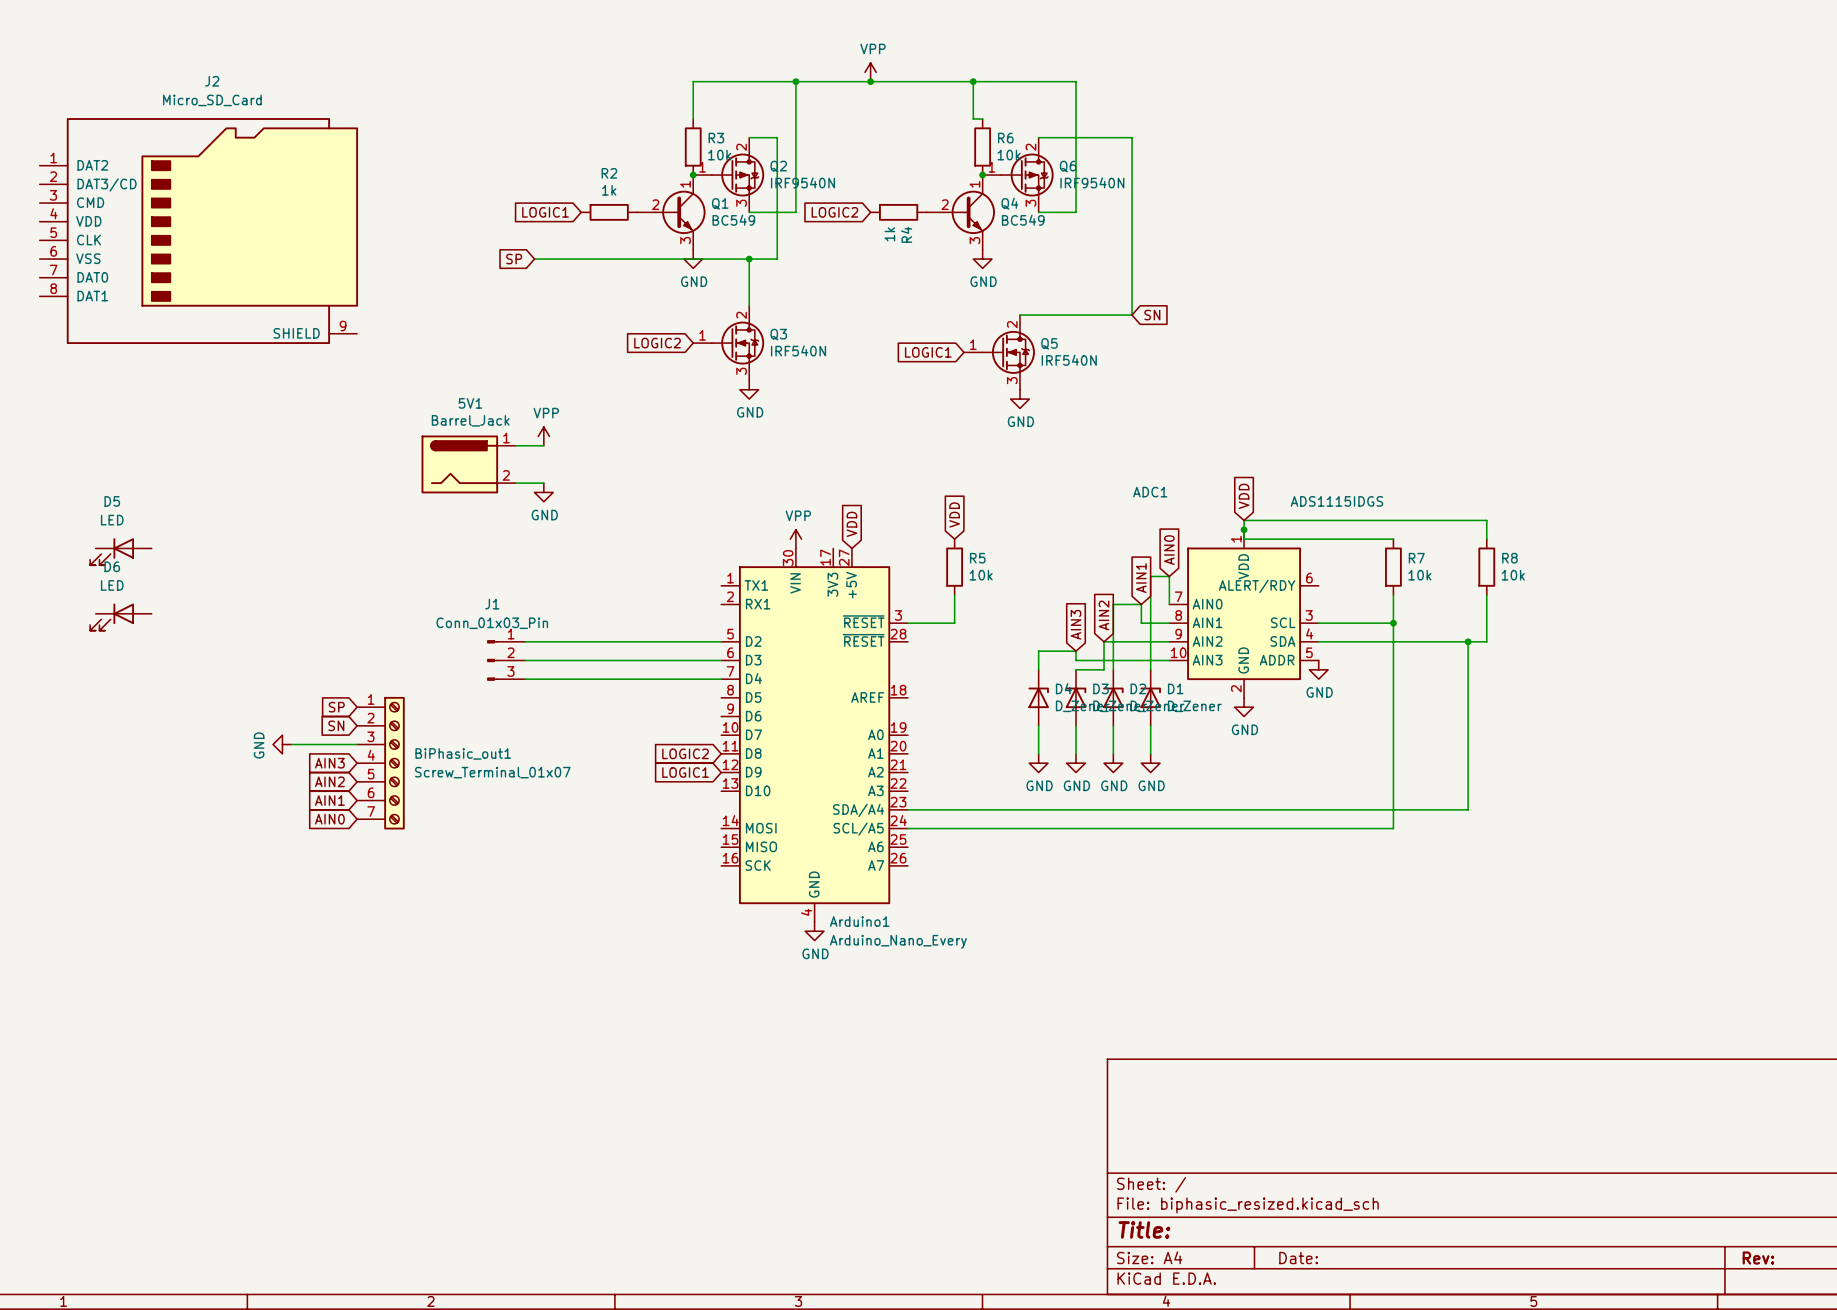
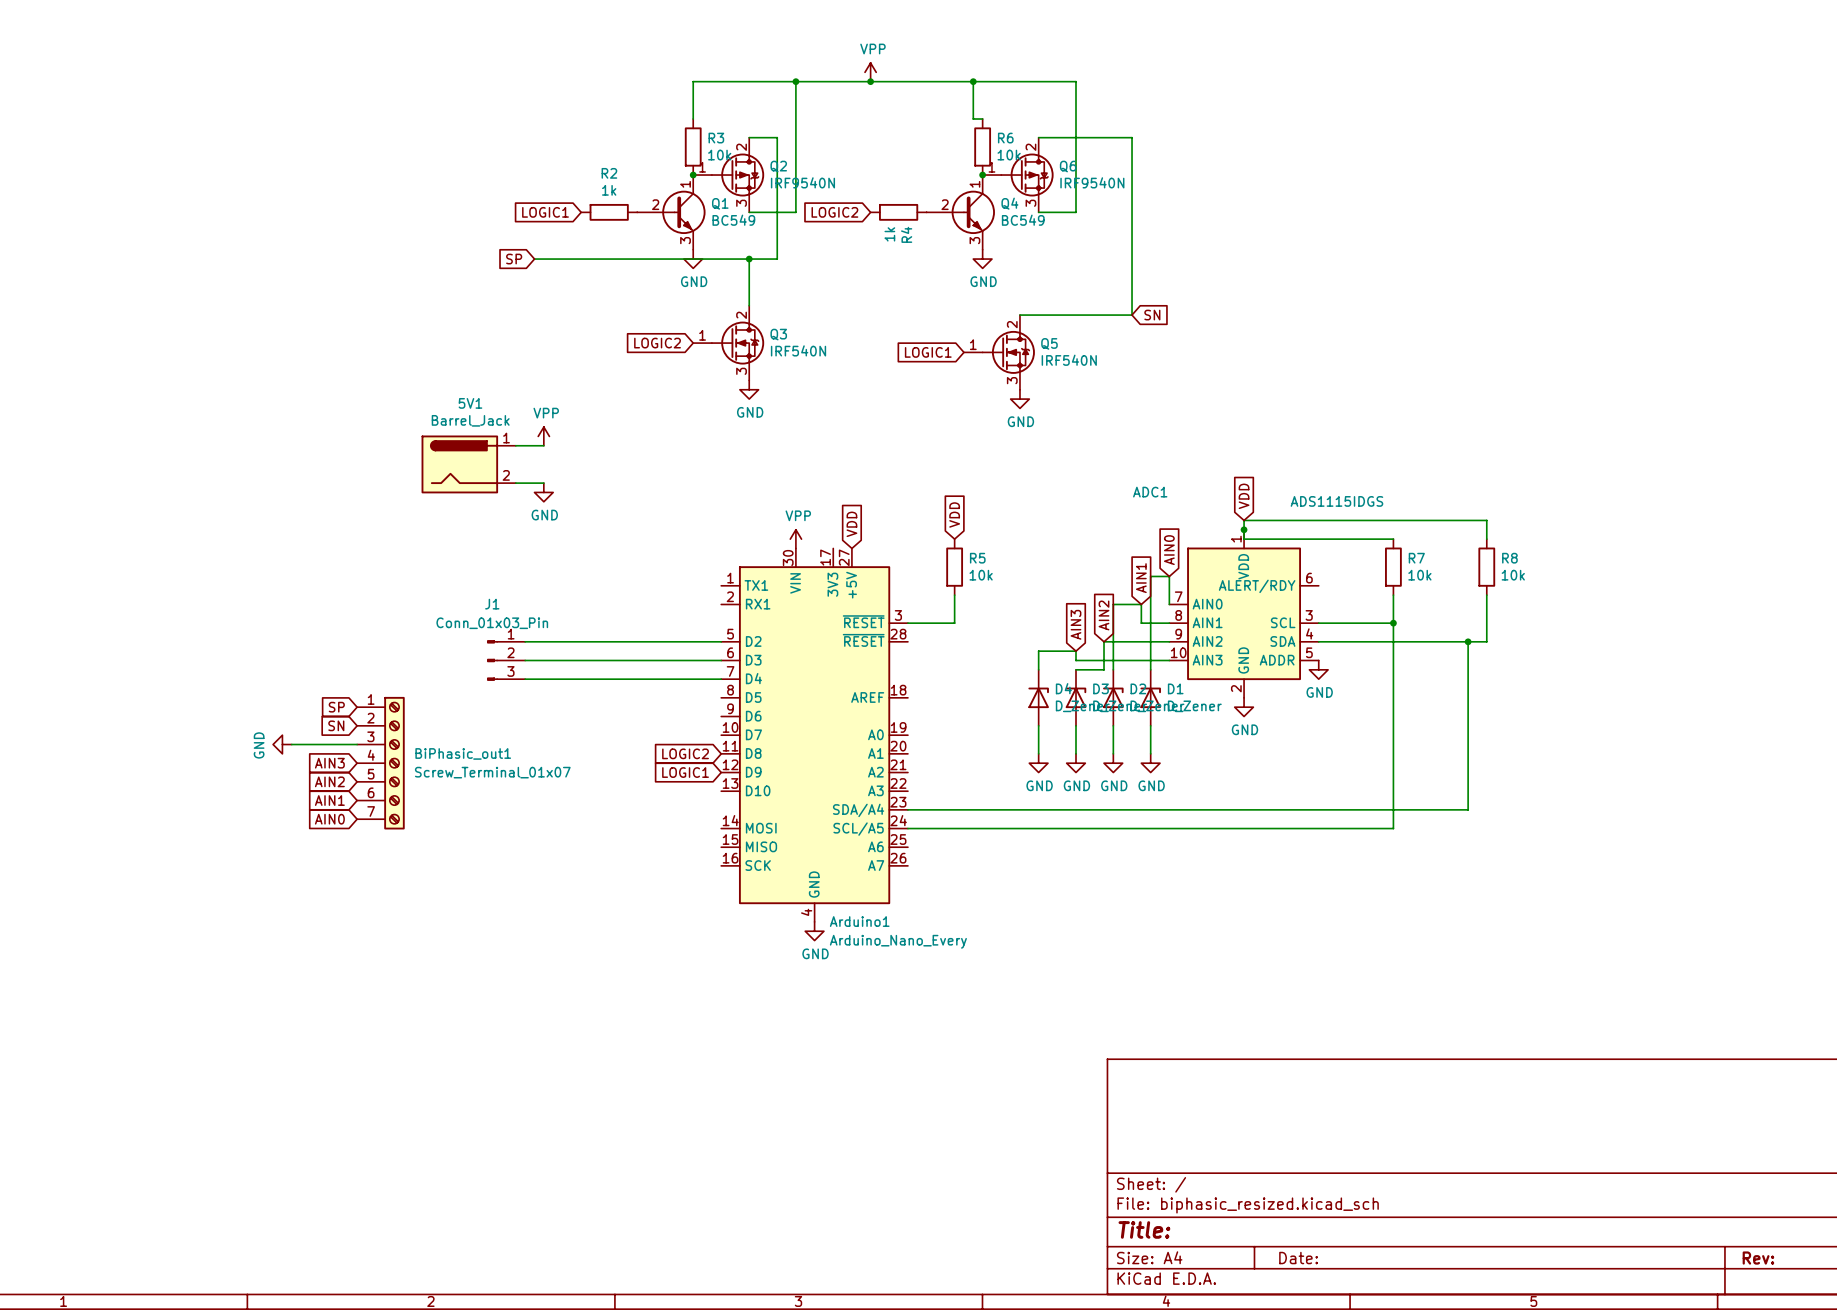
J2: Micro_SD_Card (198, 231) -> none
D5: LED (120, 551) -> none
D6: LED (120, 617) -> none

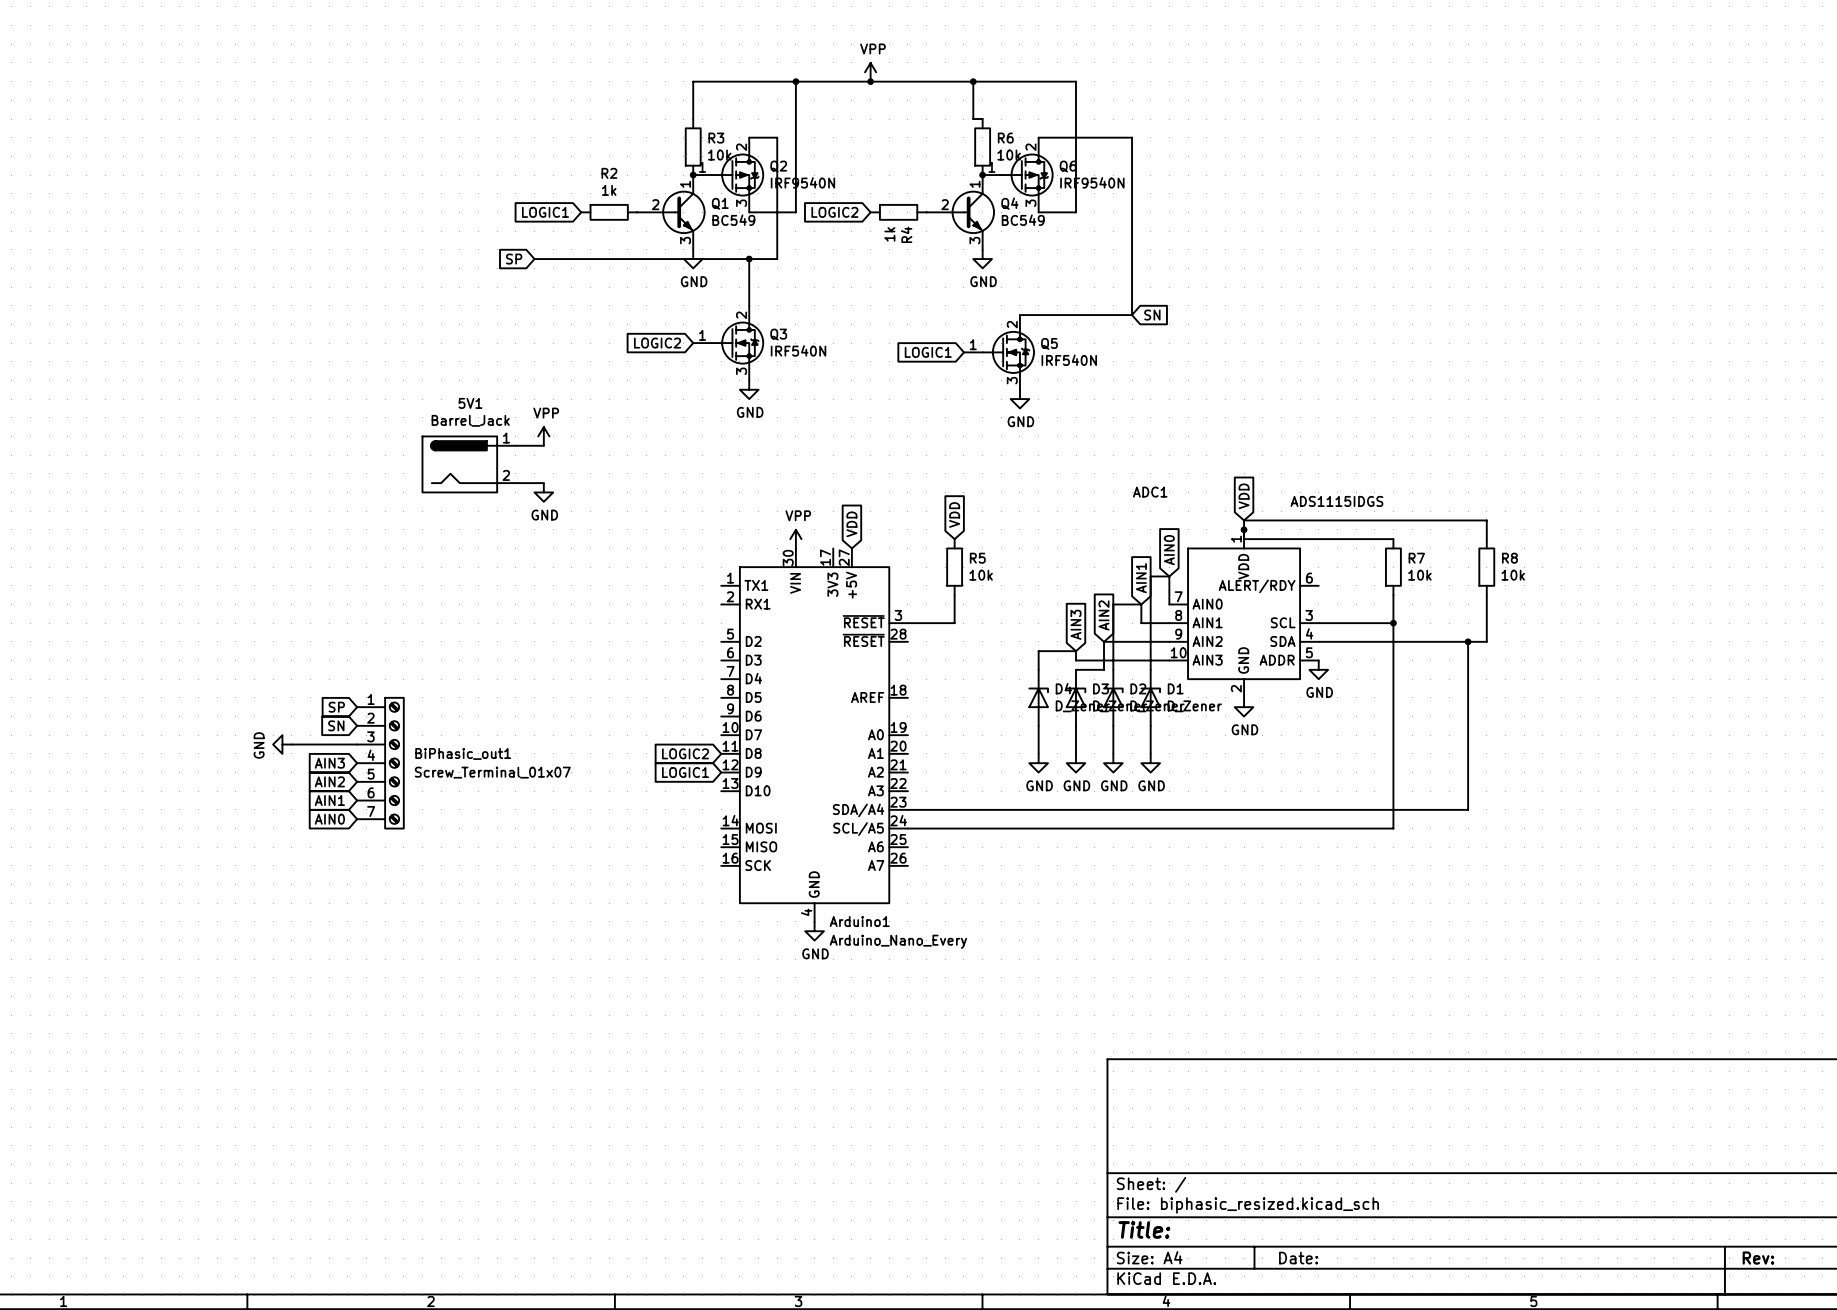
wire: (525, 641) (721, 641) -> none
J1: Conn_01x03_Pin (506, 660) -> none
wire: (525, 660) (721, 660) -> none
wire: (525, 679) (721, 679) -> none

